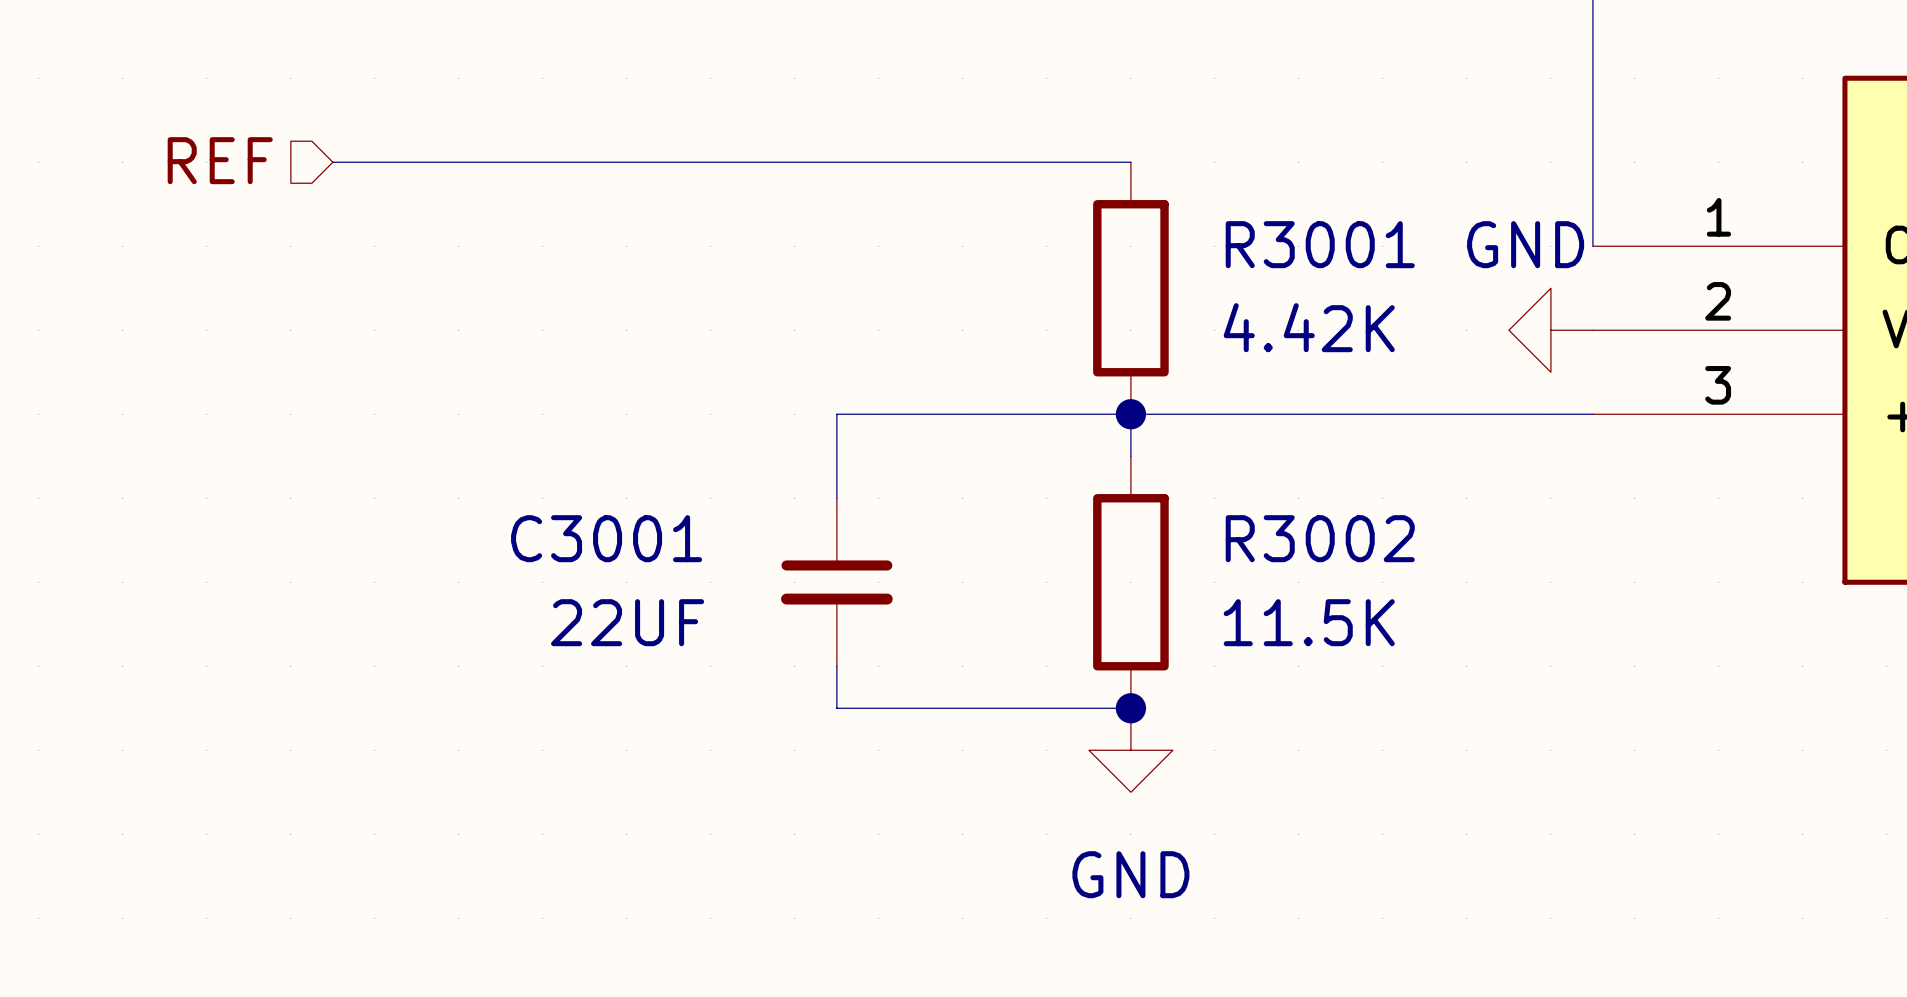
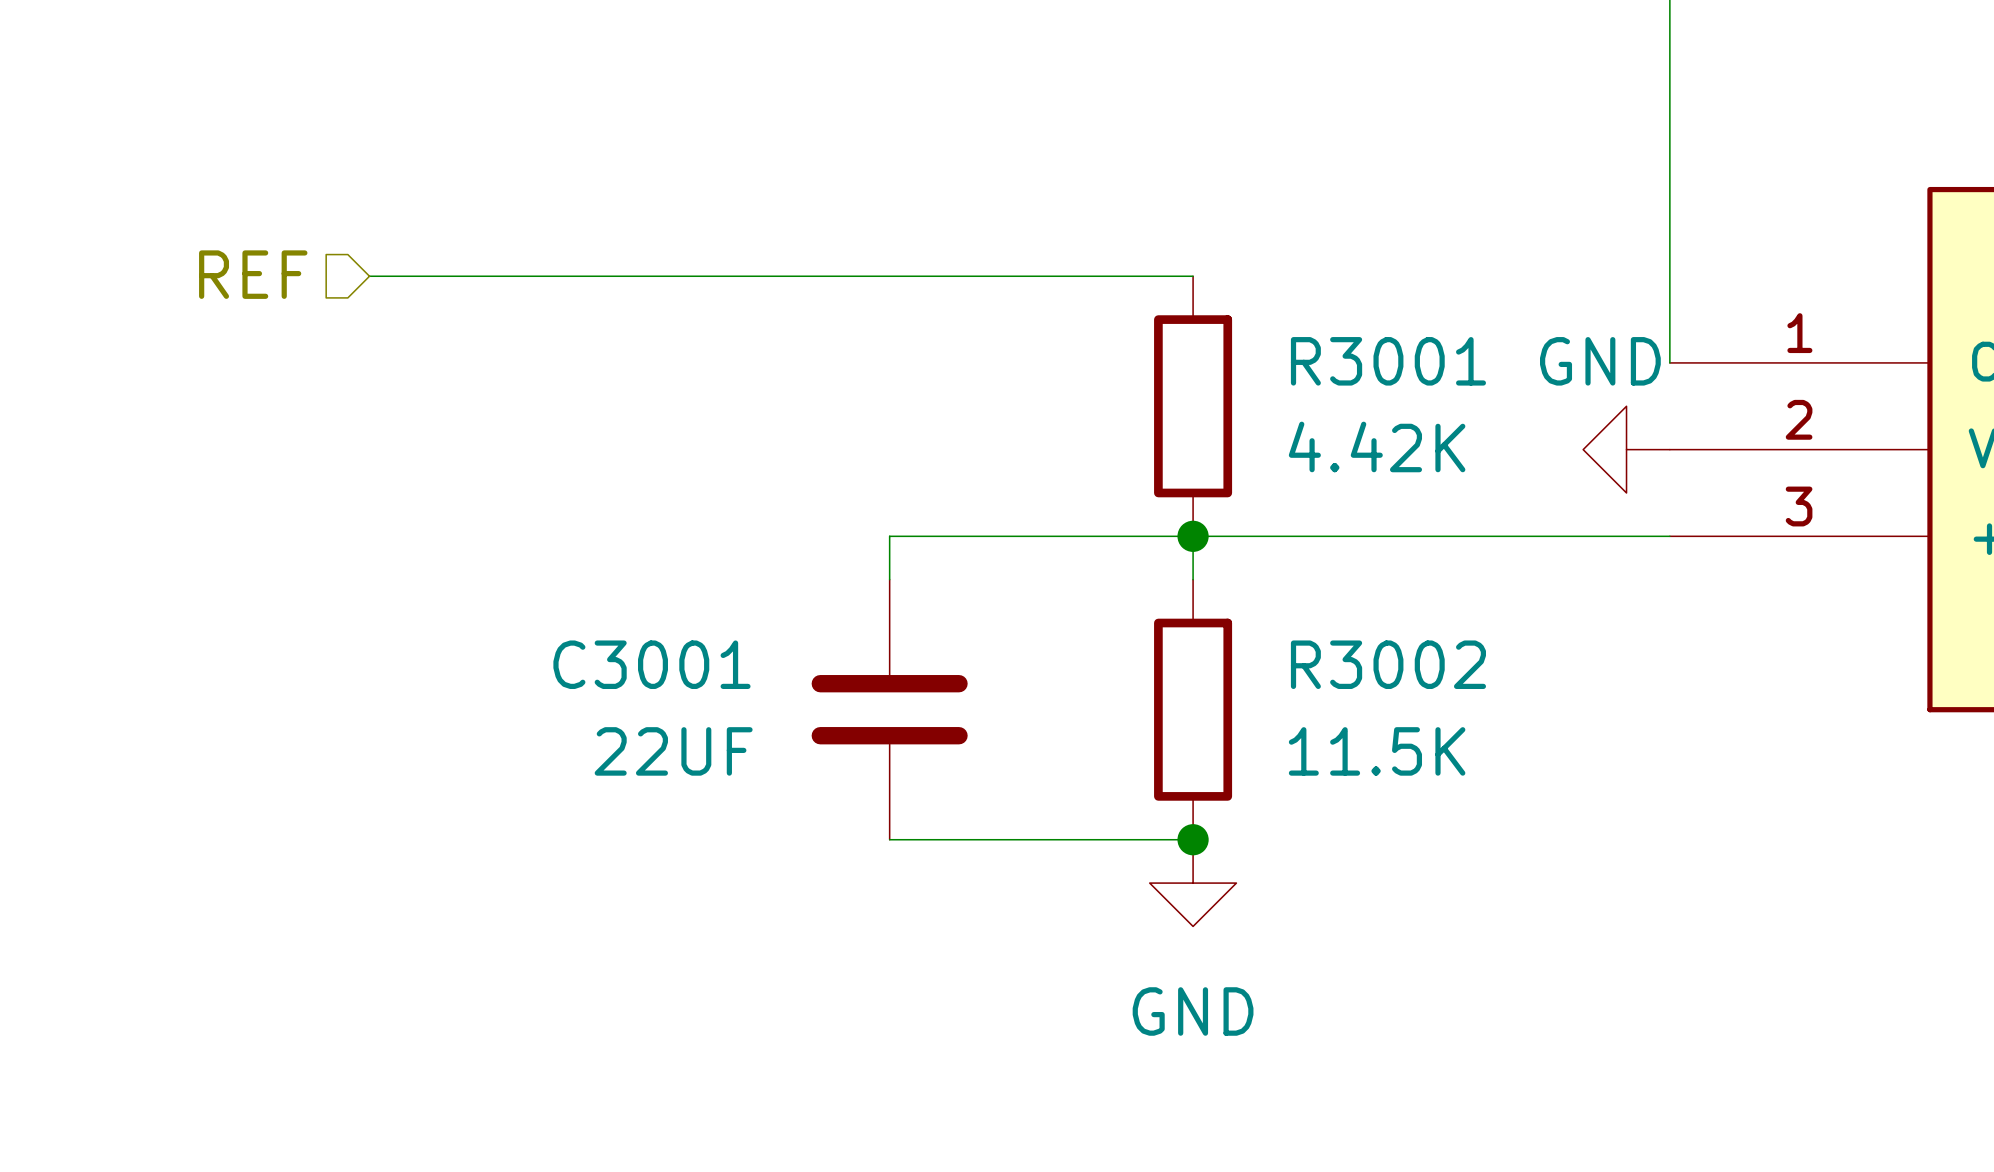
C3001 symbol: [781, 498, 893, 667] -> [811, 579, 968, 840]

